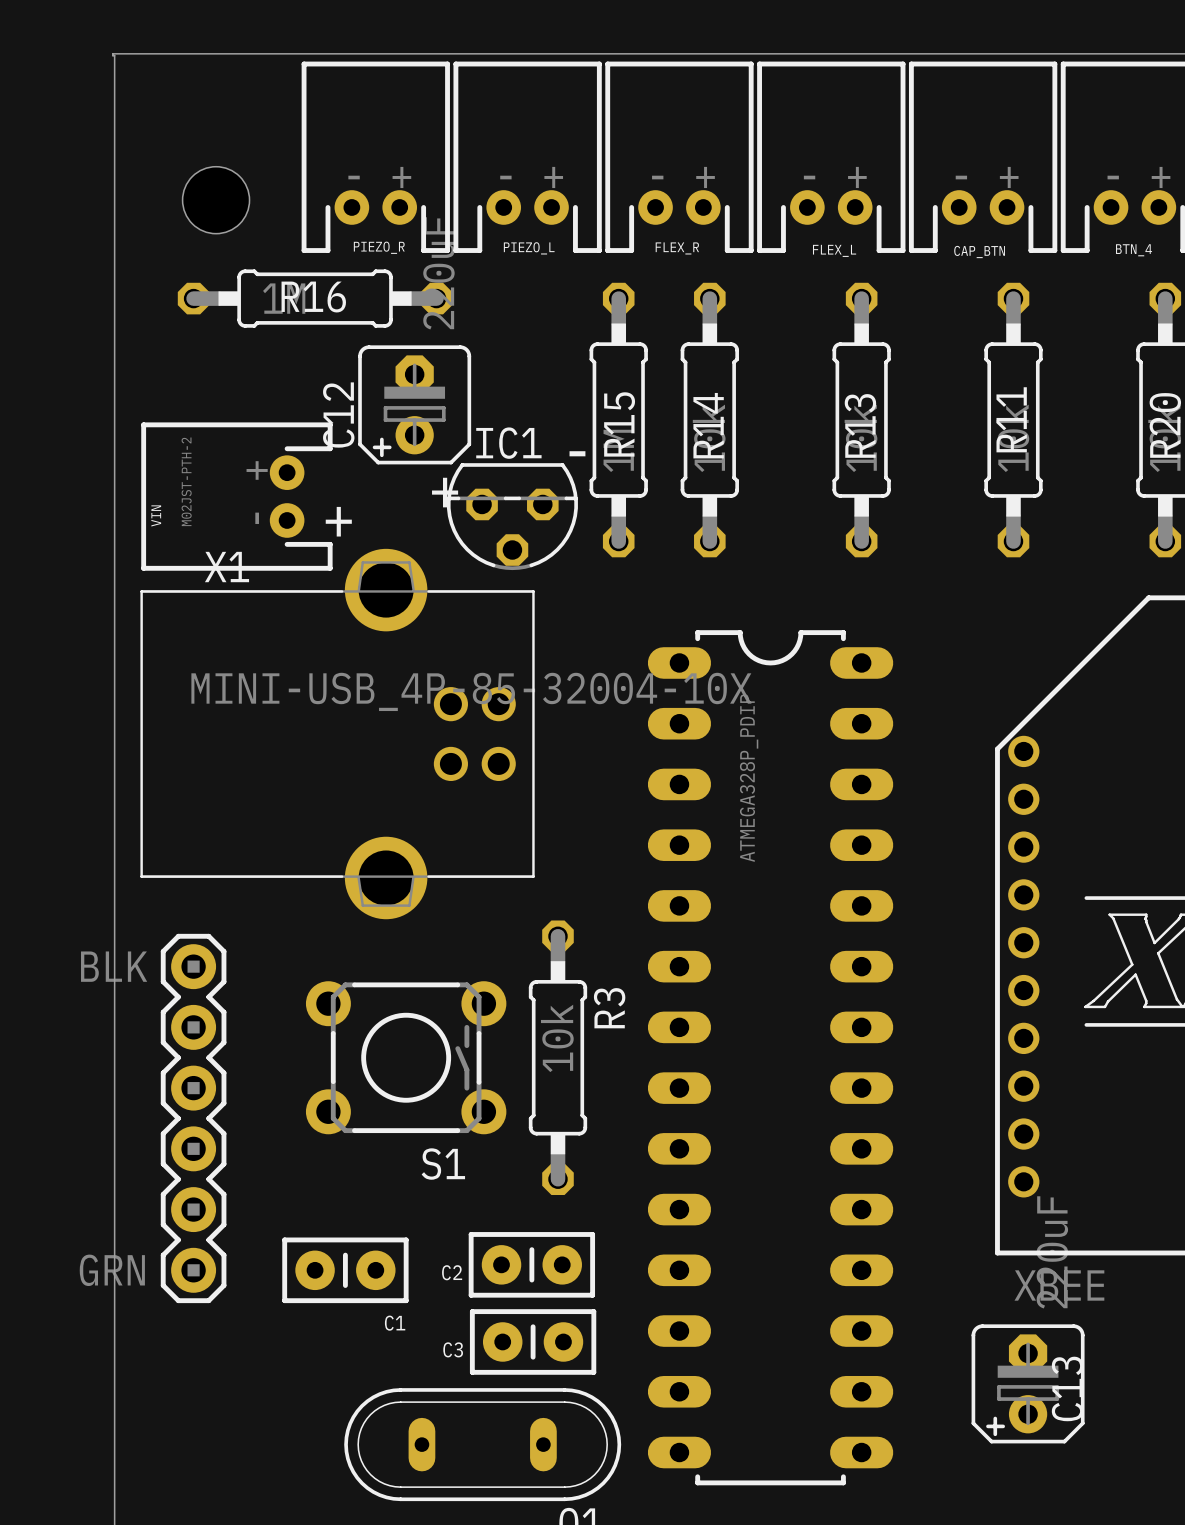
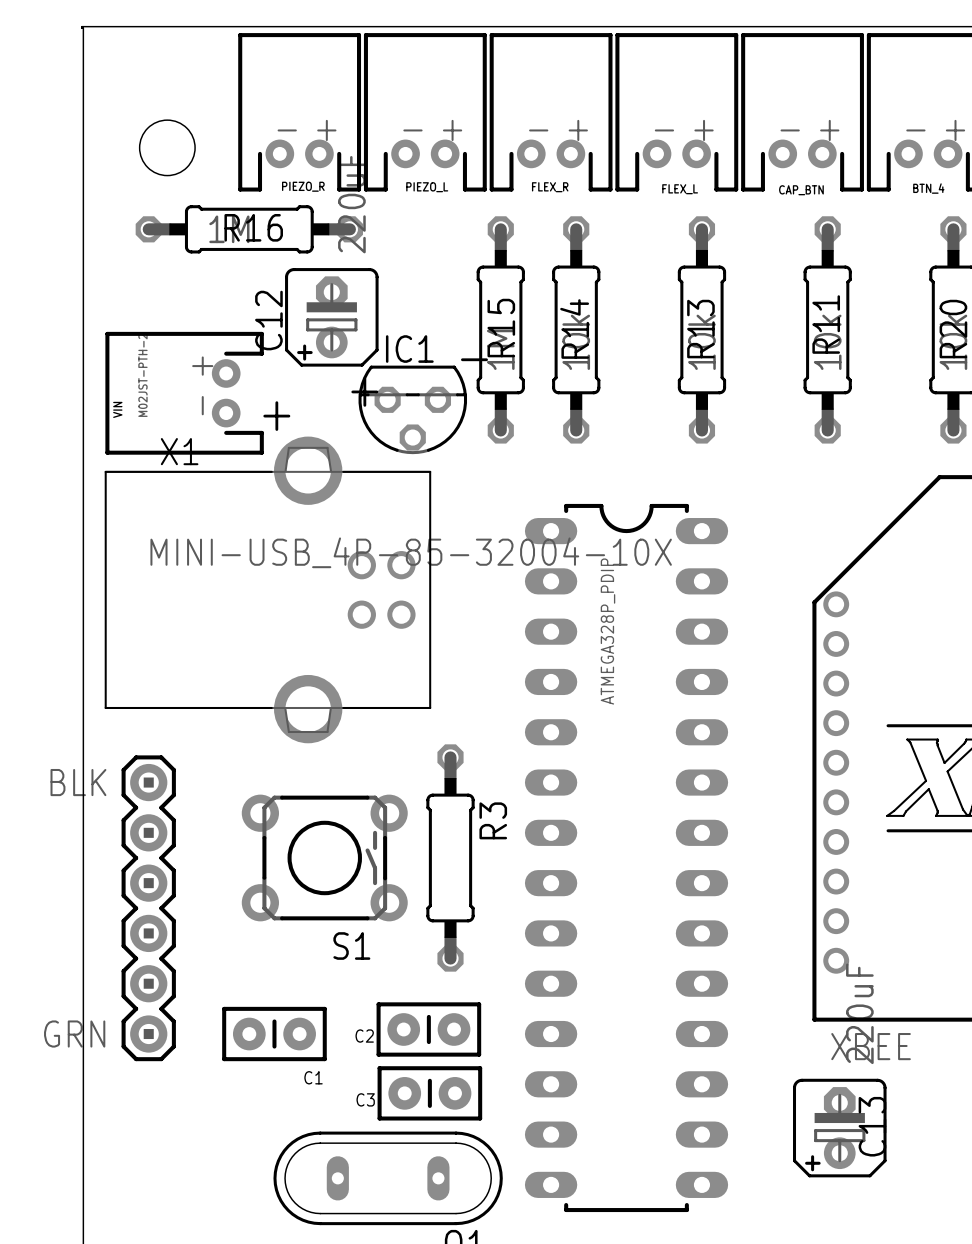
R3 value: 10k (557, 1038) -> none

